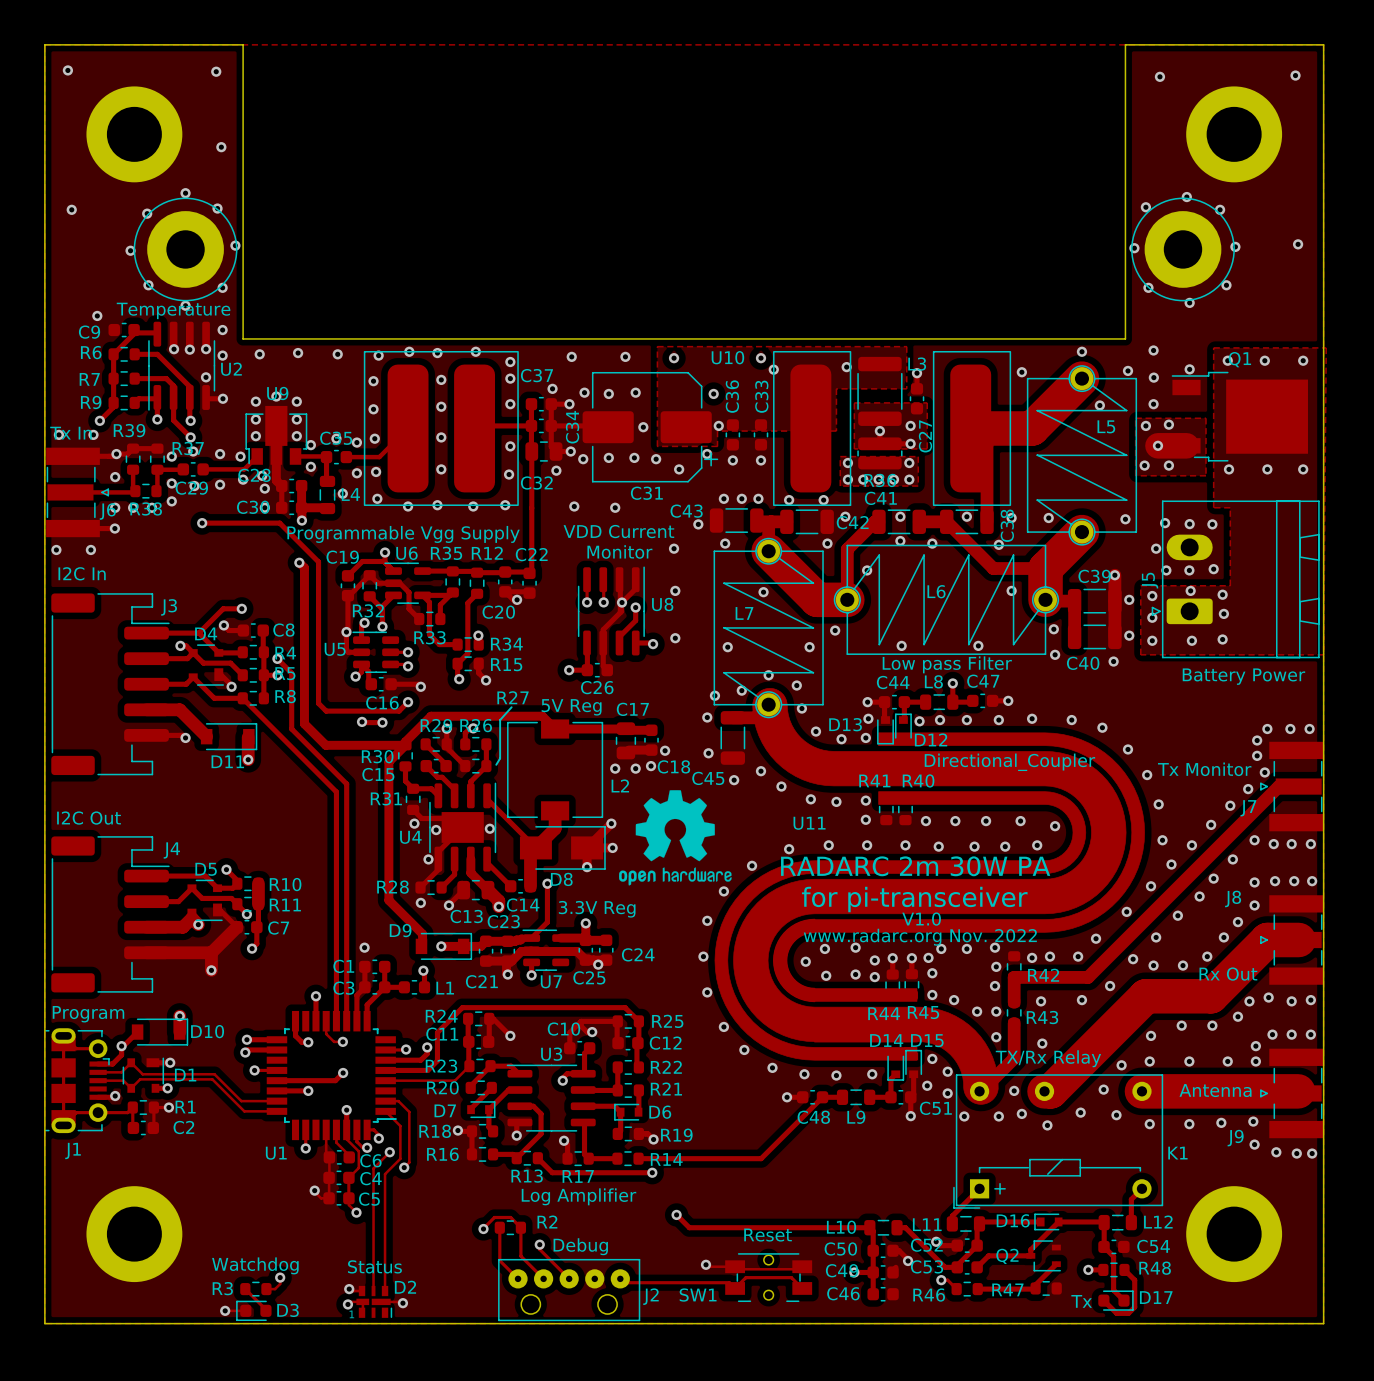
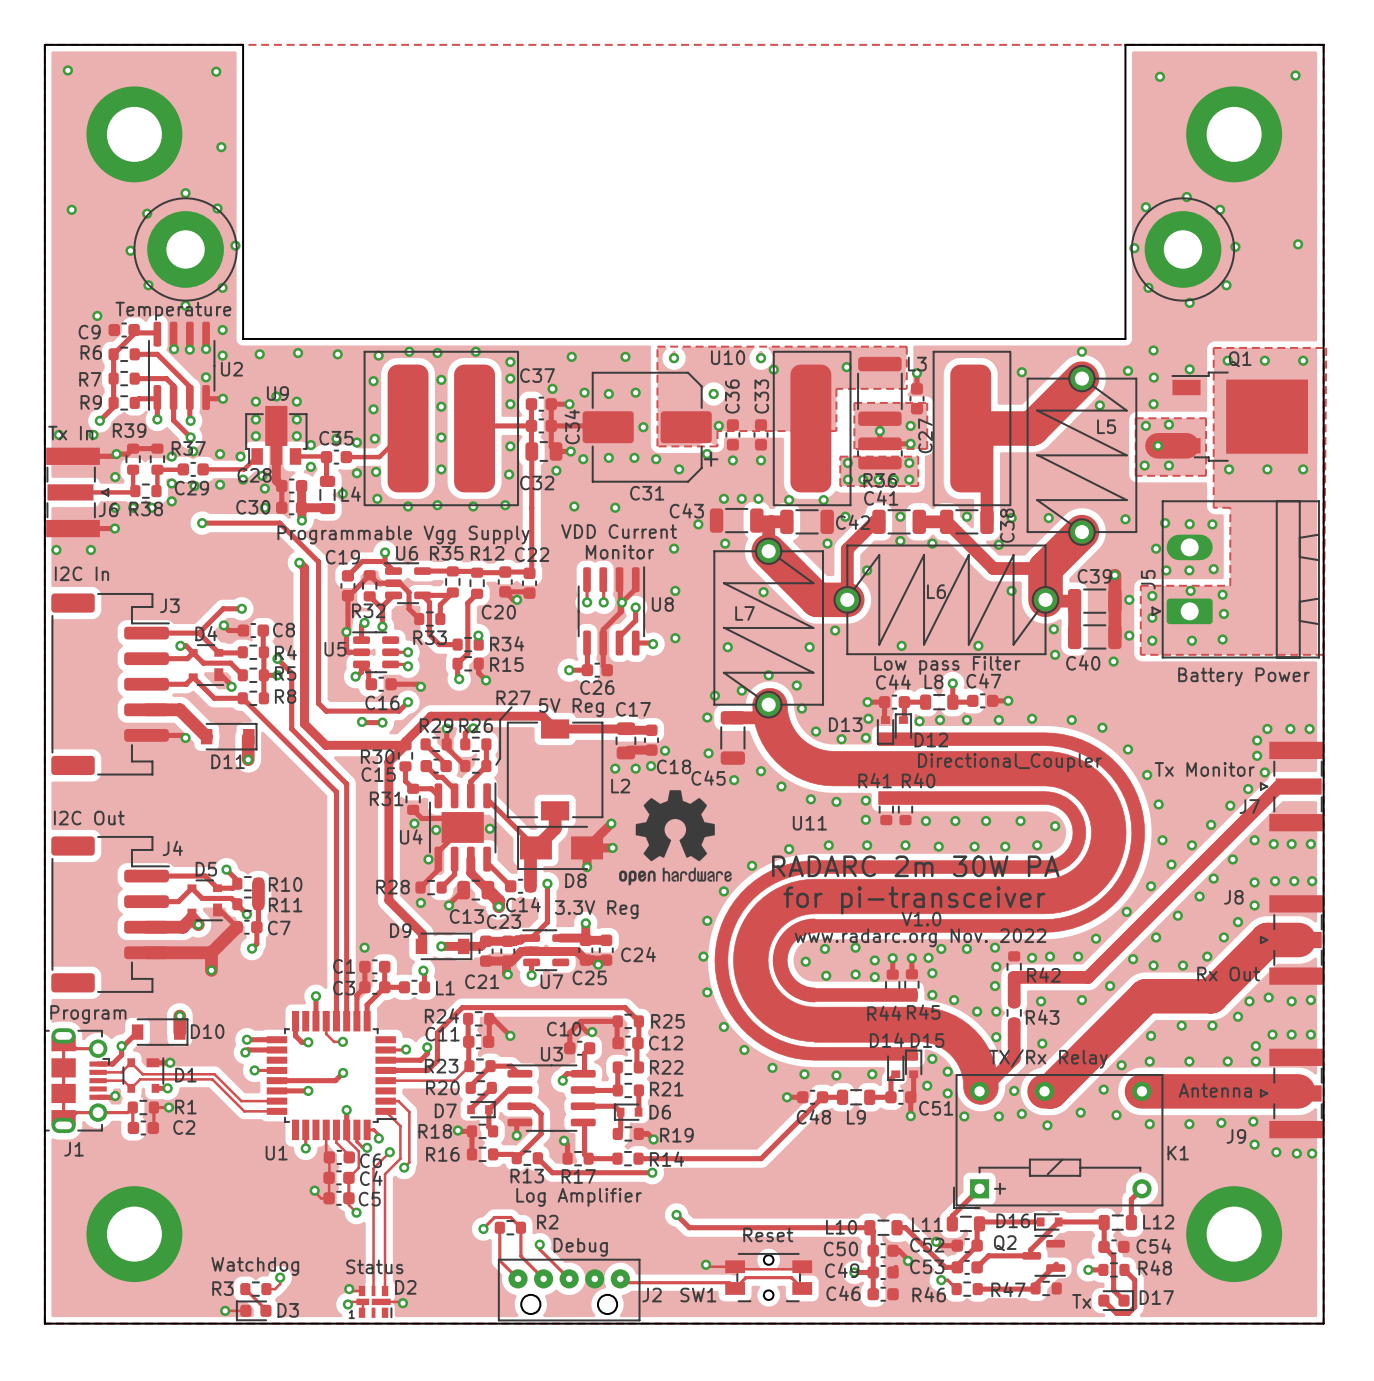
D8 rotation: 0° (562, 847) -> 180° (560, 847)
Q2 footprint: [1026, 1240, 1061, 1272] -> [1022, 1235, 1066, 1277]

